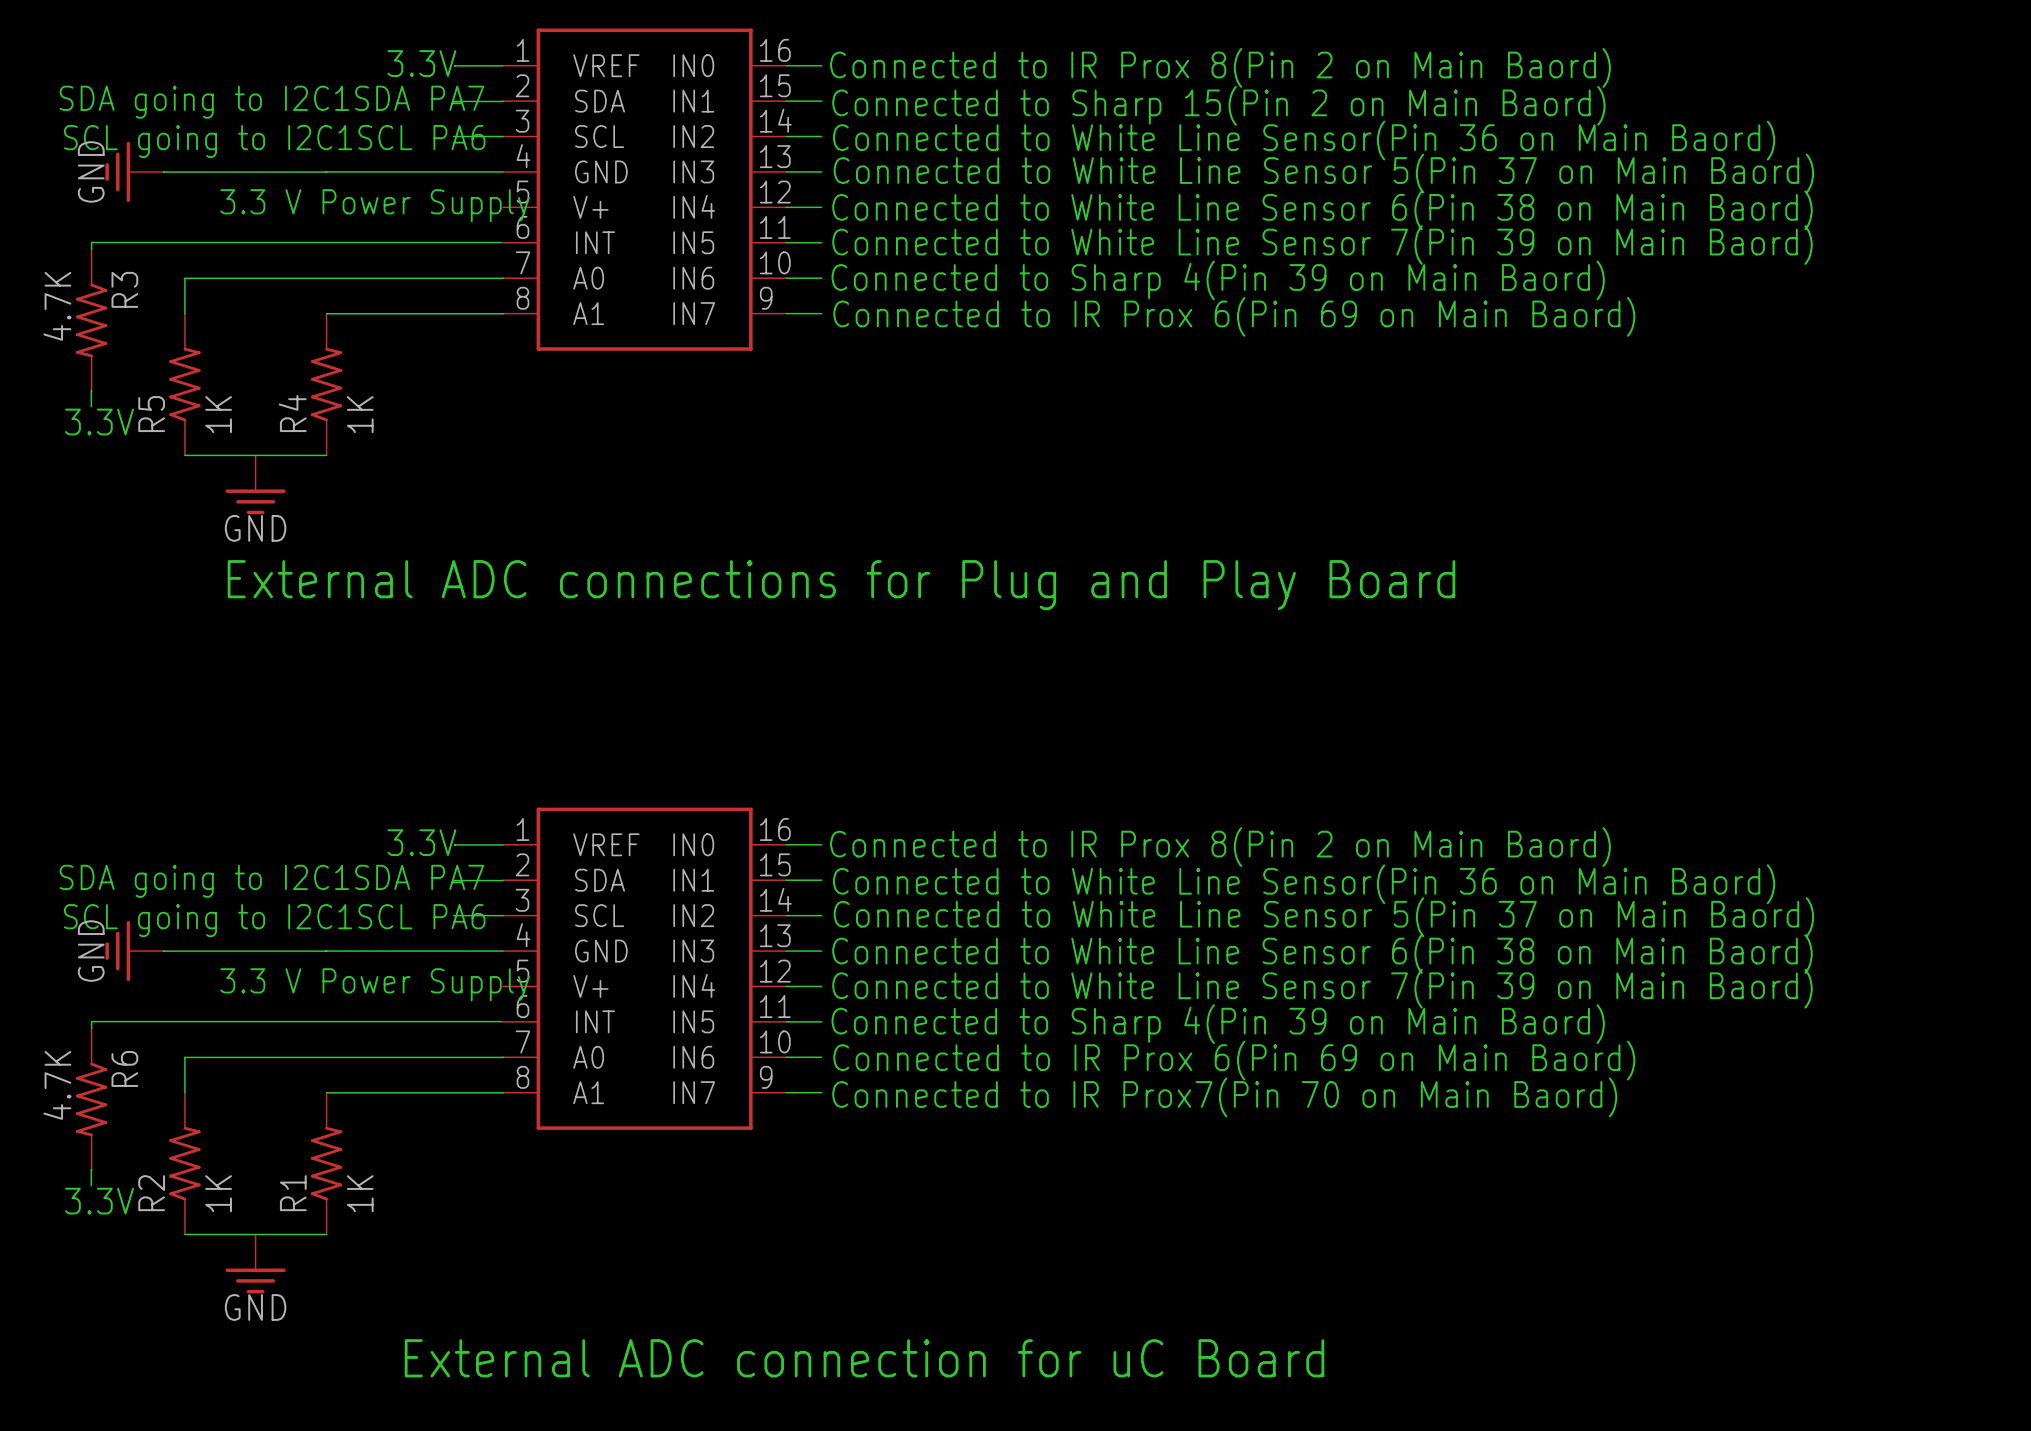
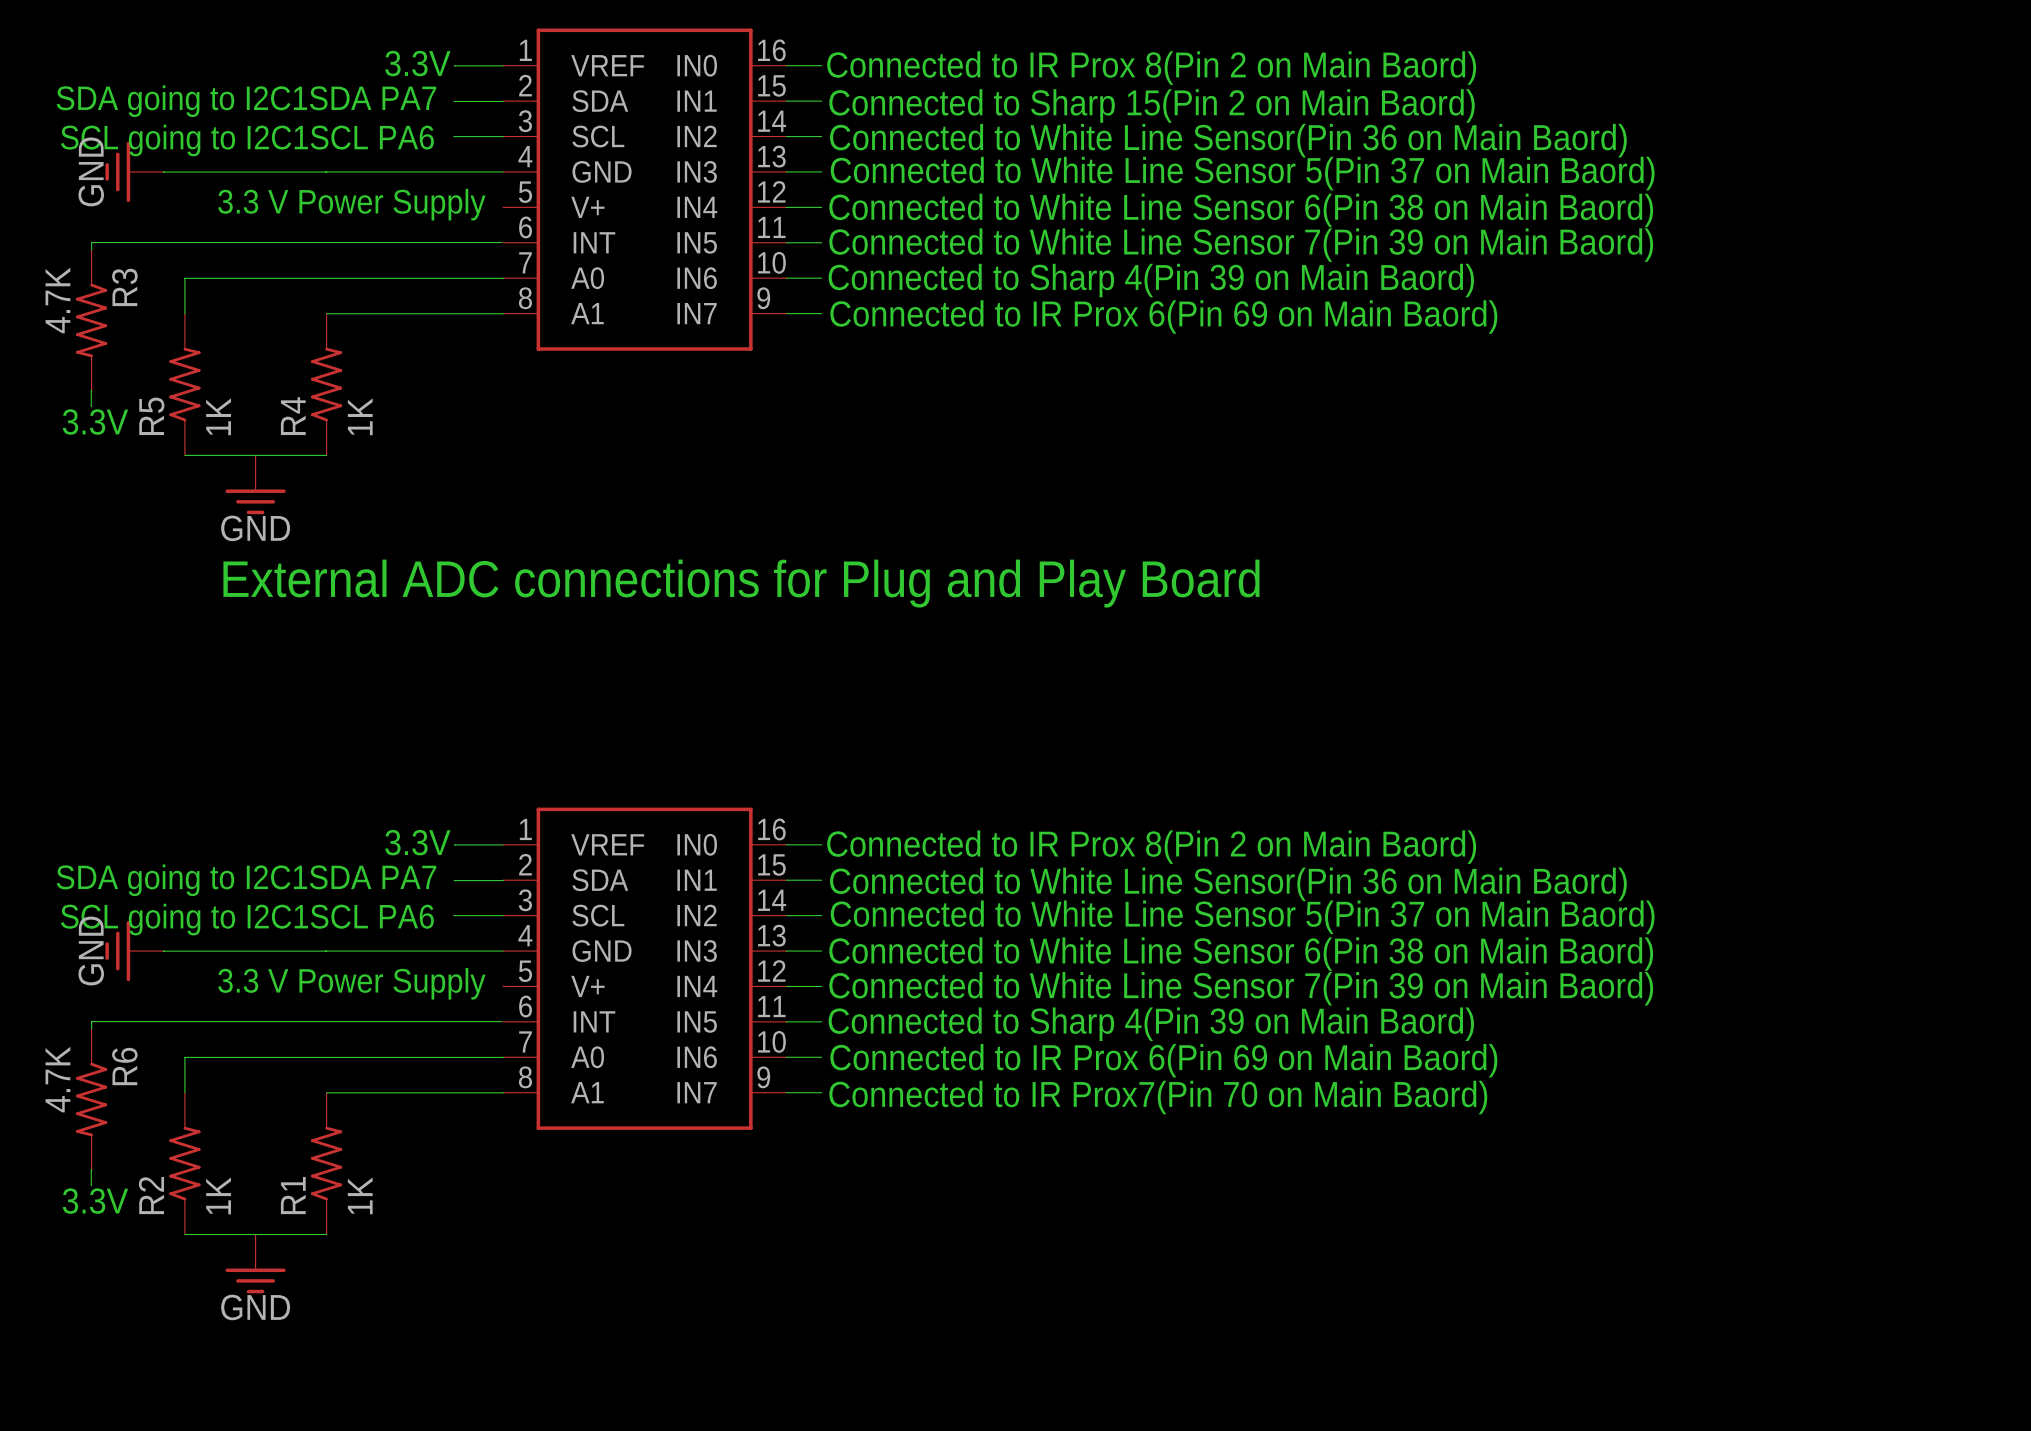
text: External ADC connection for uC Board (864, 1358) -> none

